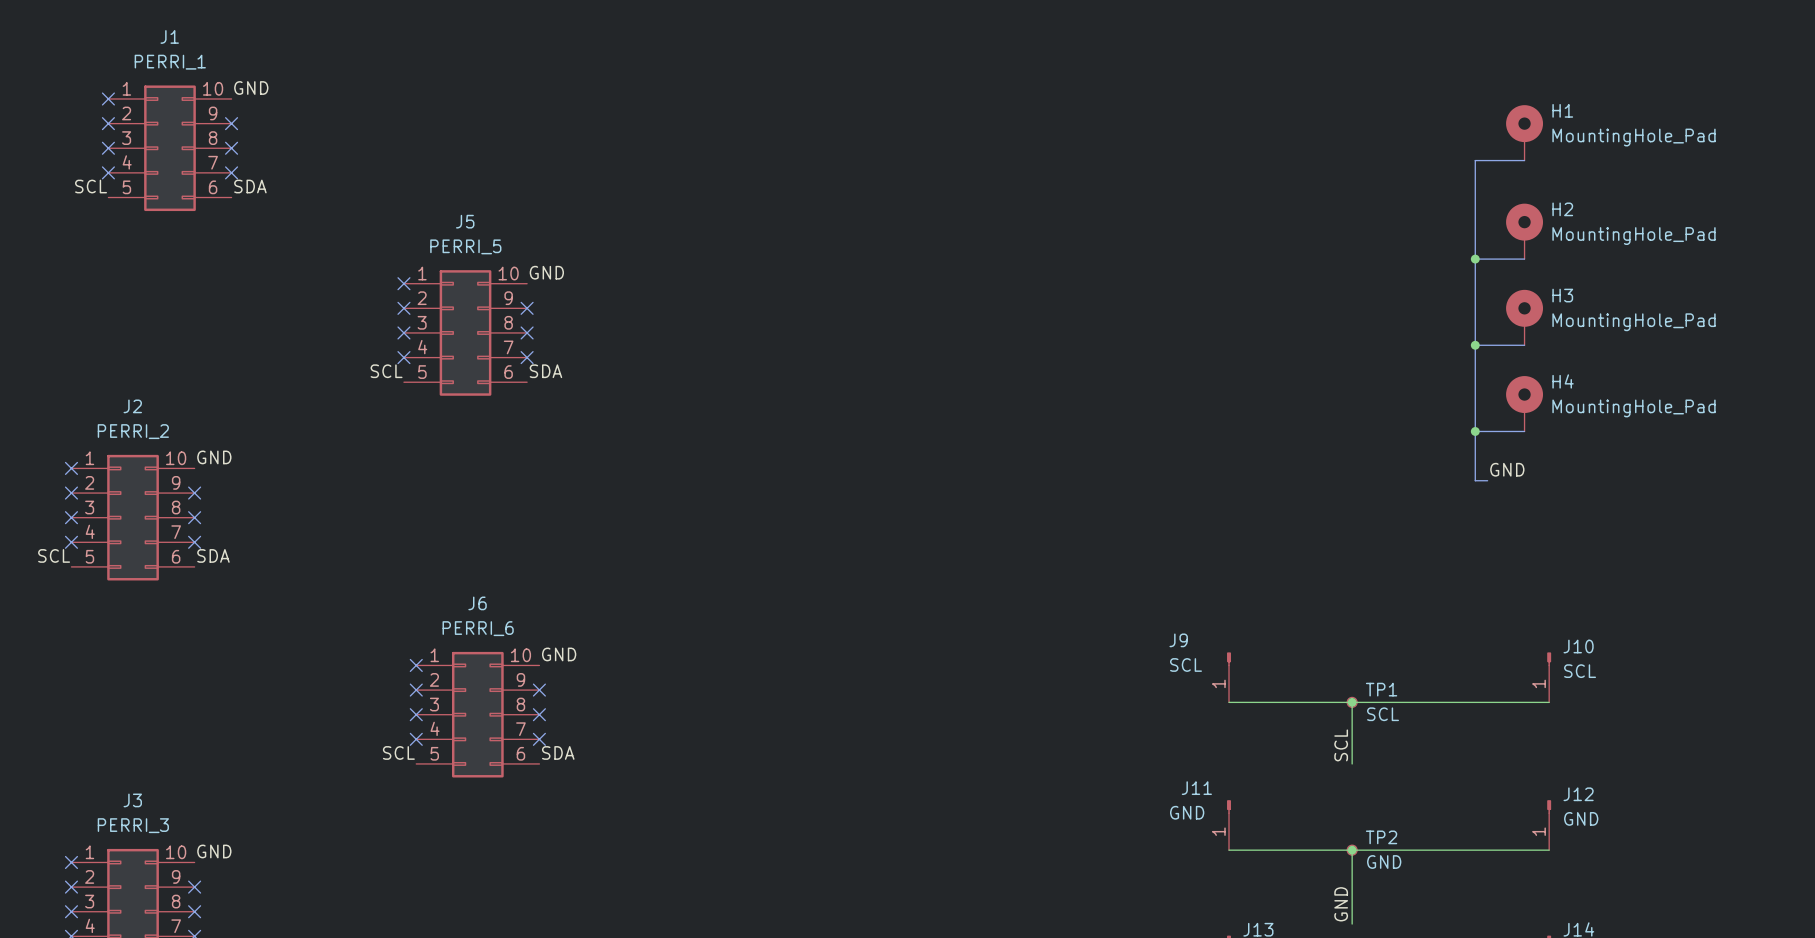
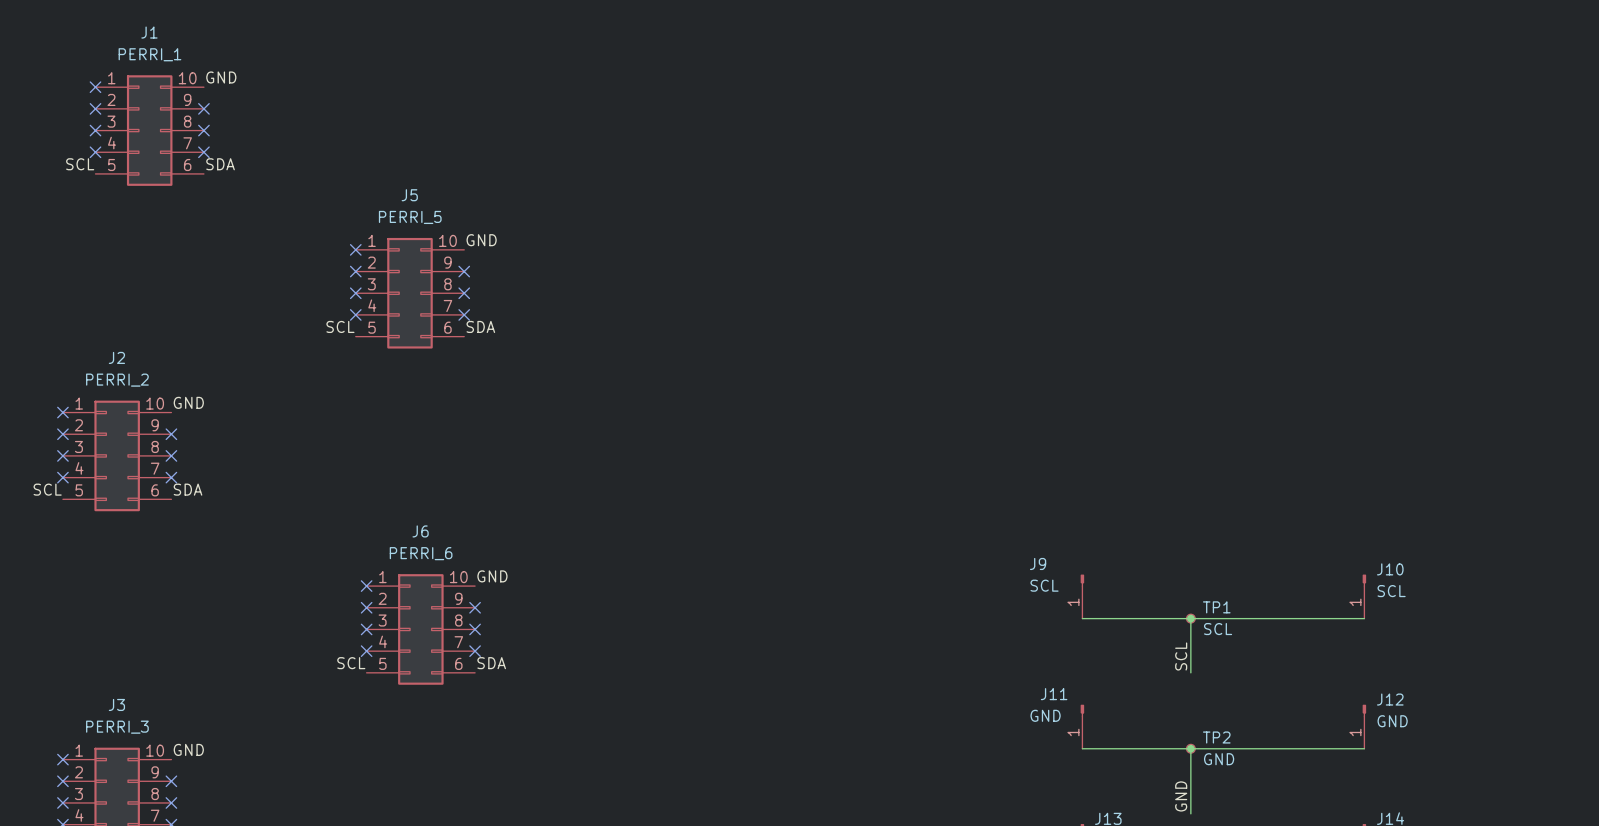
H1: MountingHole_Pad (1524, 132) -> none
bus: (1524, 160) (1475, 160) (1475, 480) (1487, 480) -> none
H2: MountingHole_Pad (1524, 231) -> none
bus: (1475, 259) (1524, 259) -> none
junction: (1475, 259) -> none
H3: MountingHole_Pad (1524, 317) -> none
bus: (1475, 345) (1524, 345) -> none
junction: (1475, 345) -> none
H4: MountingHole_Pad (1524, 403) -> none
bus: (1475, 431) (1524, 431) -> none
junction: (1475, 431) -> none
label: GND (1507, 469) -> none

